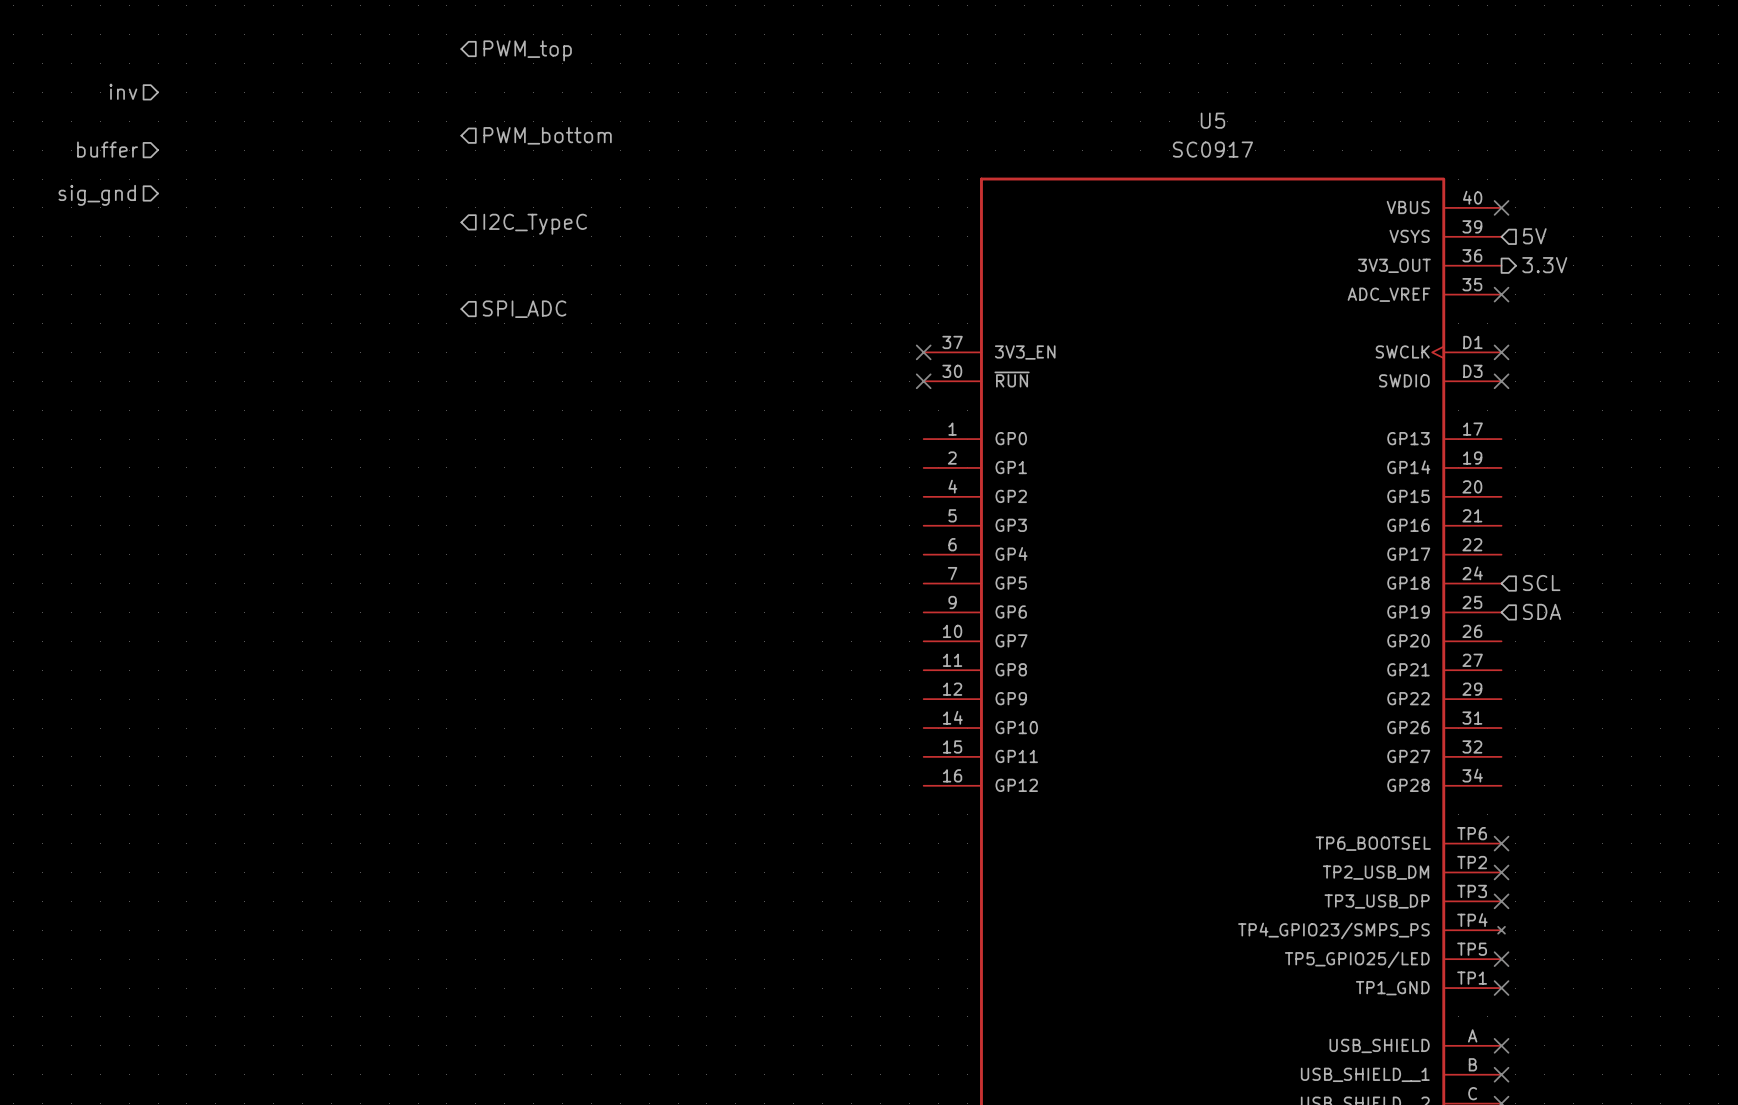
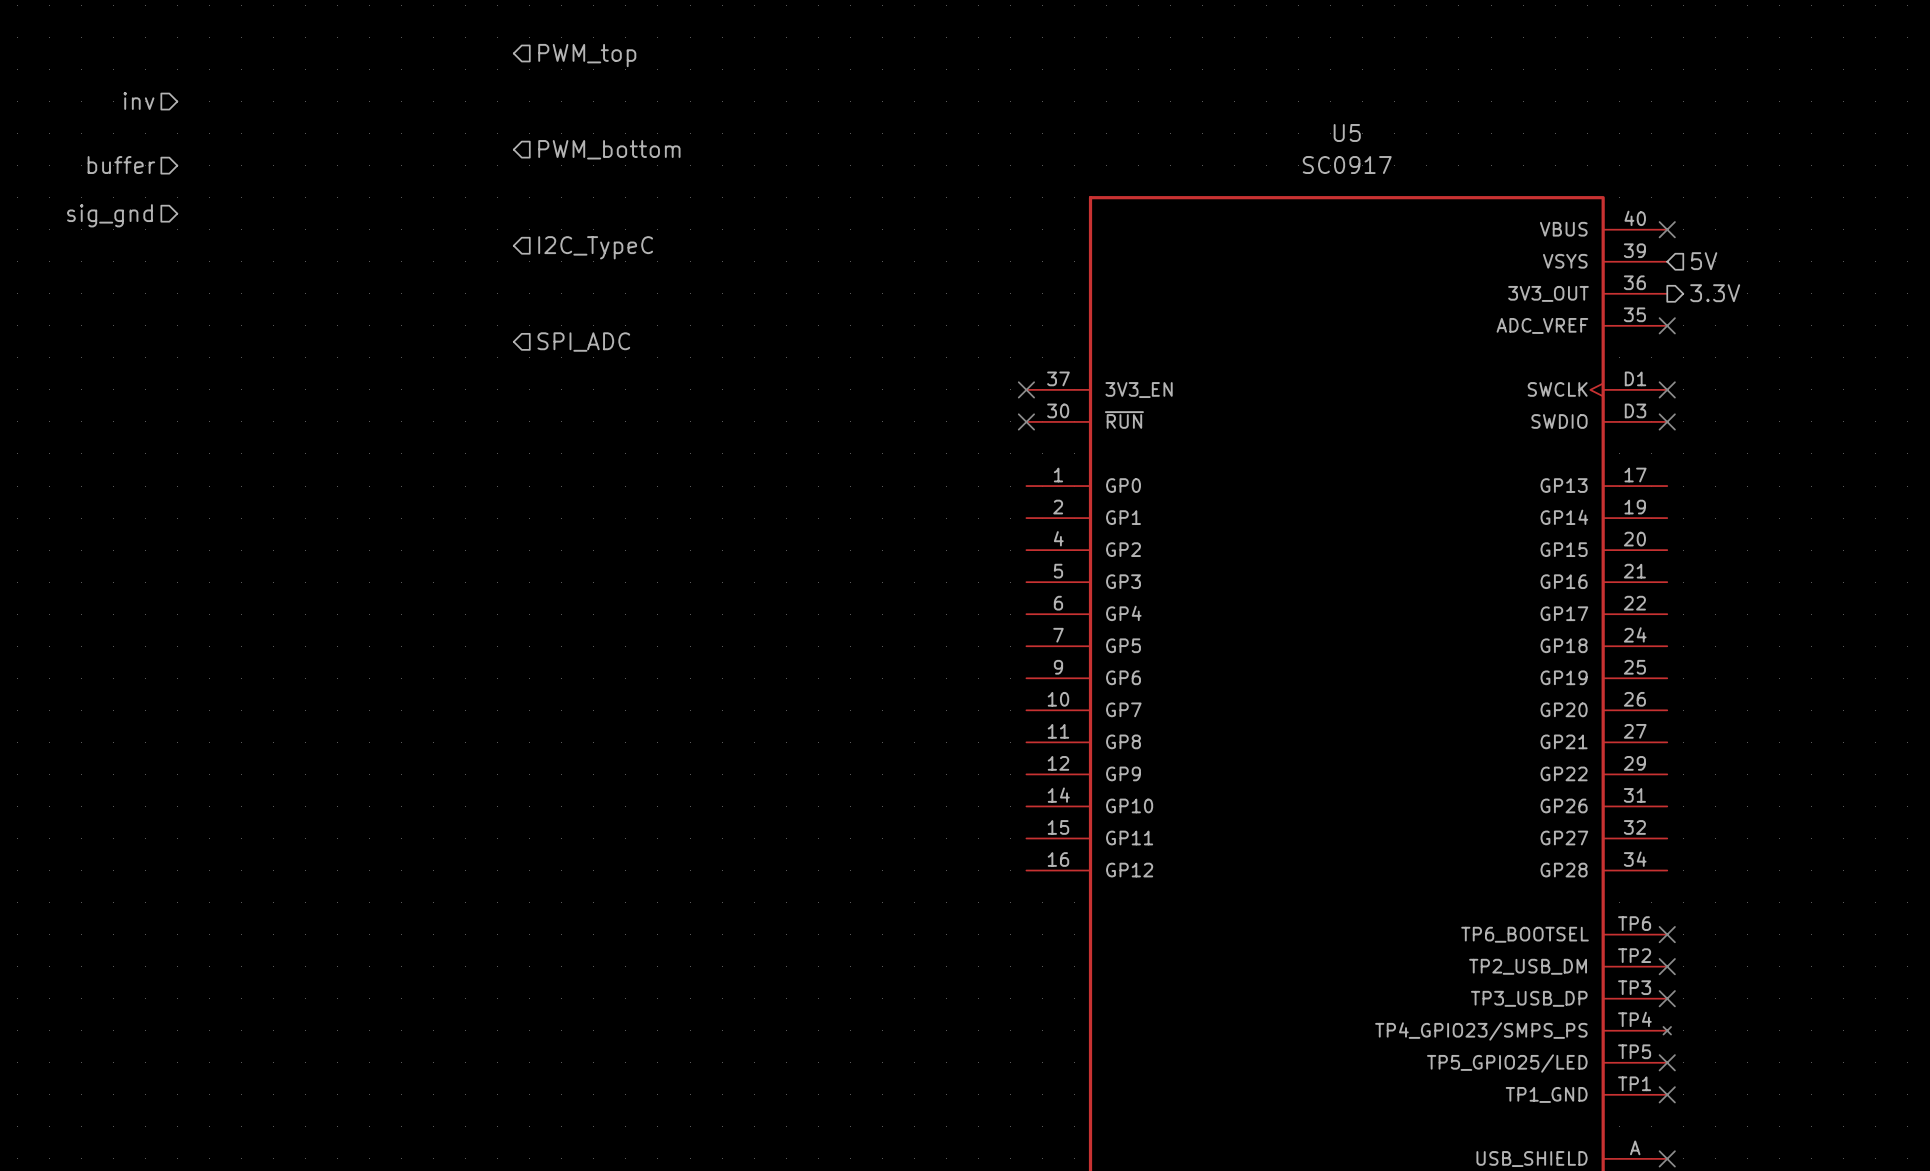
hierarchical label: SCL (1541, 583) -> none
hierarchical label: SDA (1542, 611) -> none

